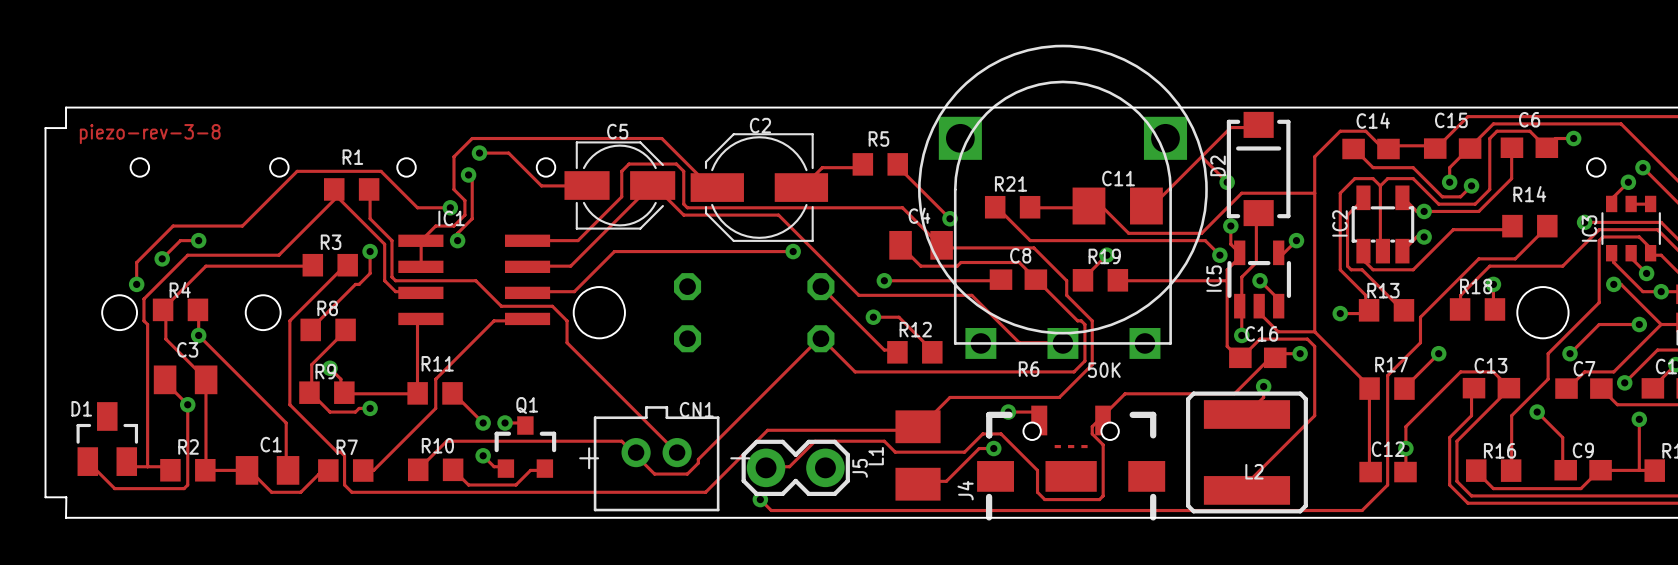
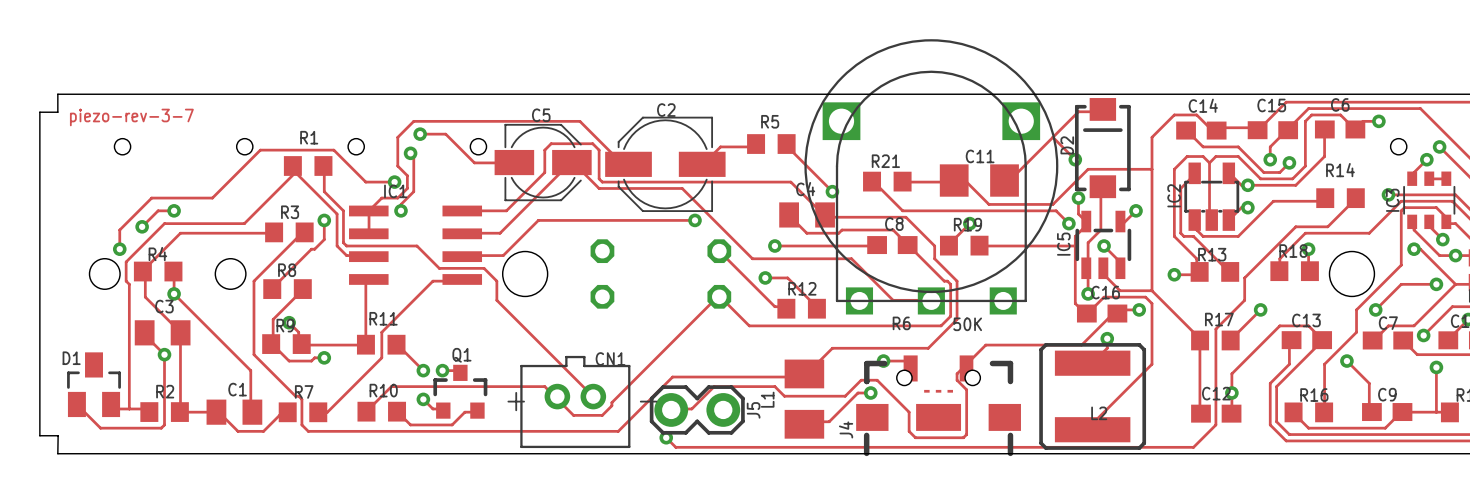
text: piezo-rev-3-8 (150, 134) -> piezo-rev-3-7 (131, 117)

